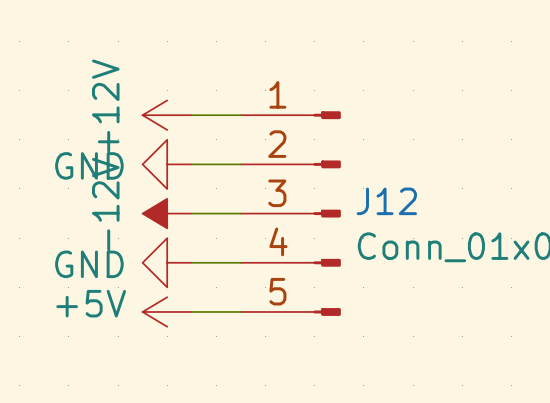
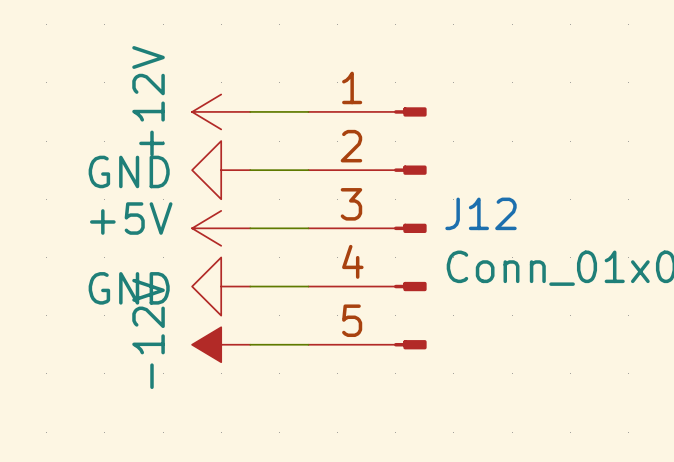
power symbol: -12V (167, 213) -> +5V (221, 228)
power symbol: +5V (167, 311) -> -12V (221, 344)

